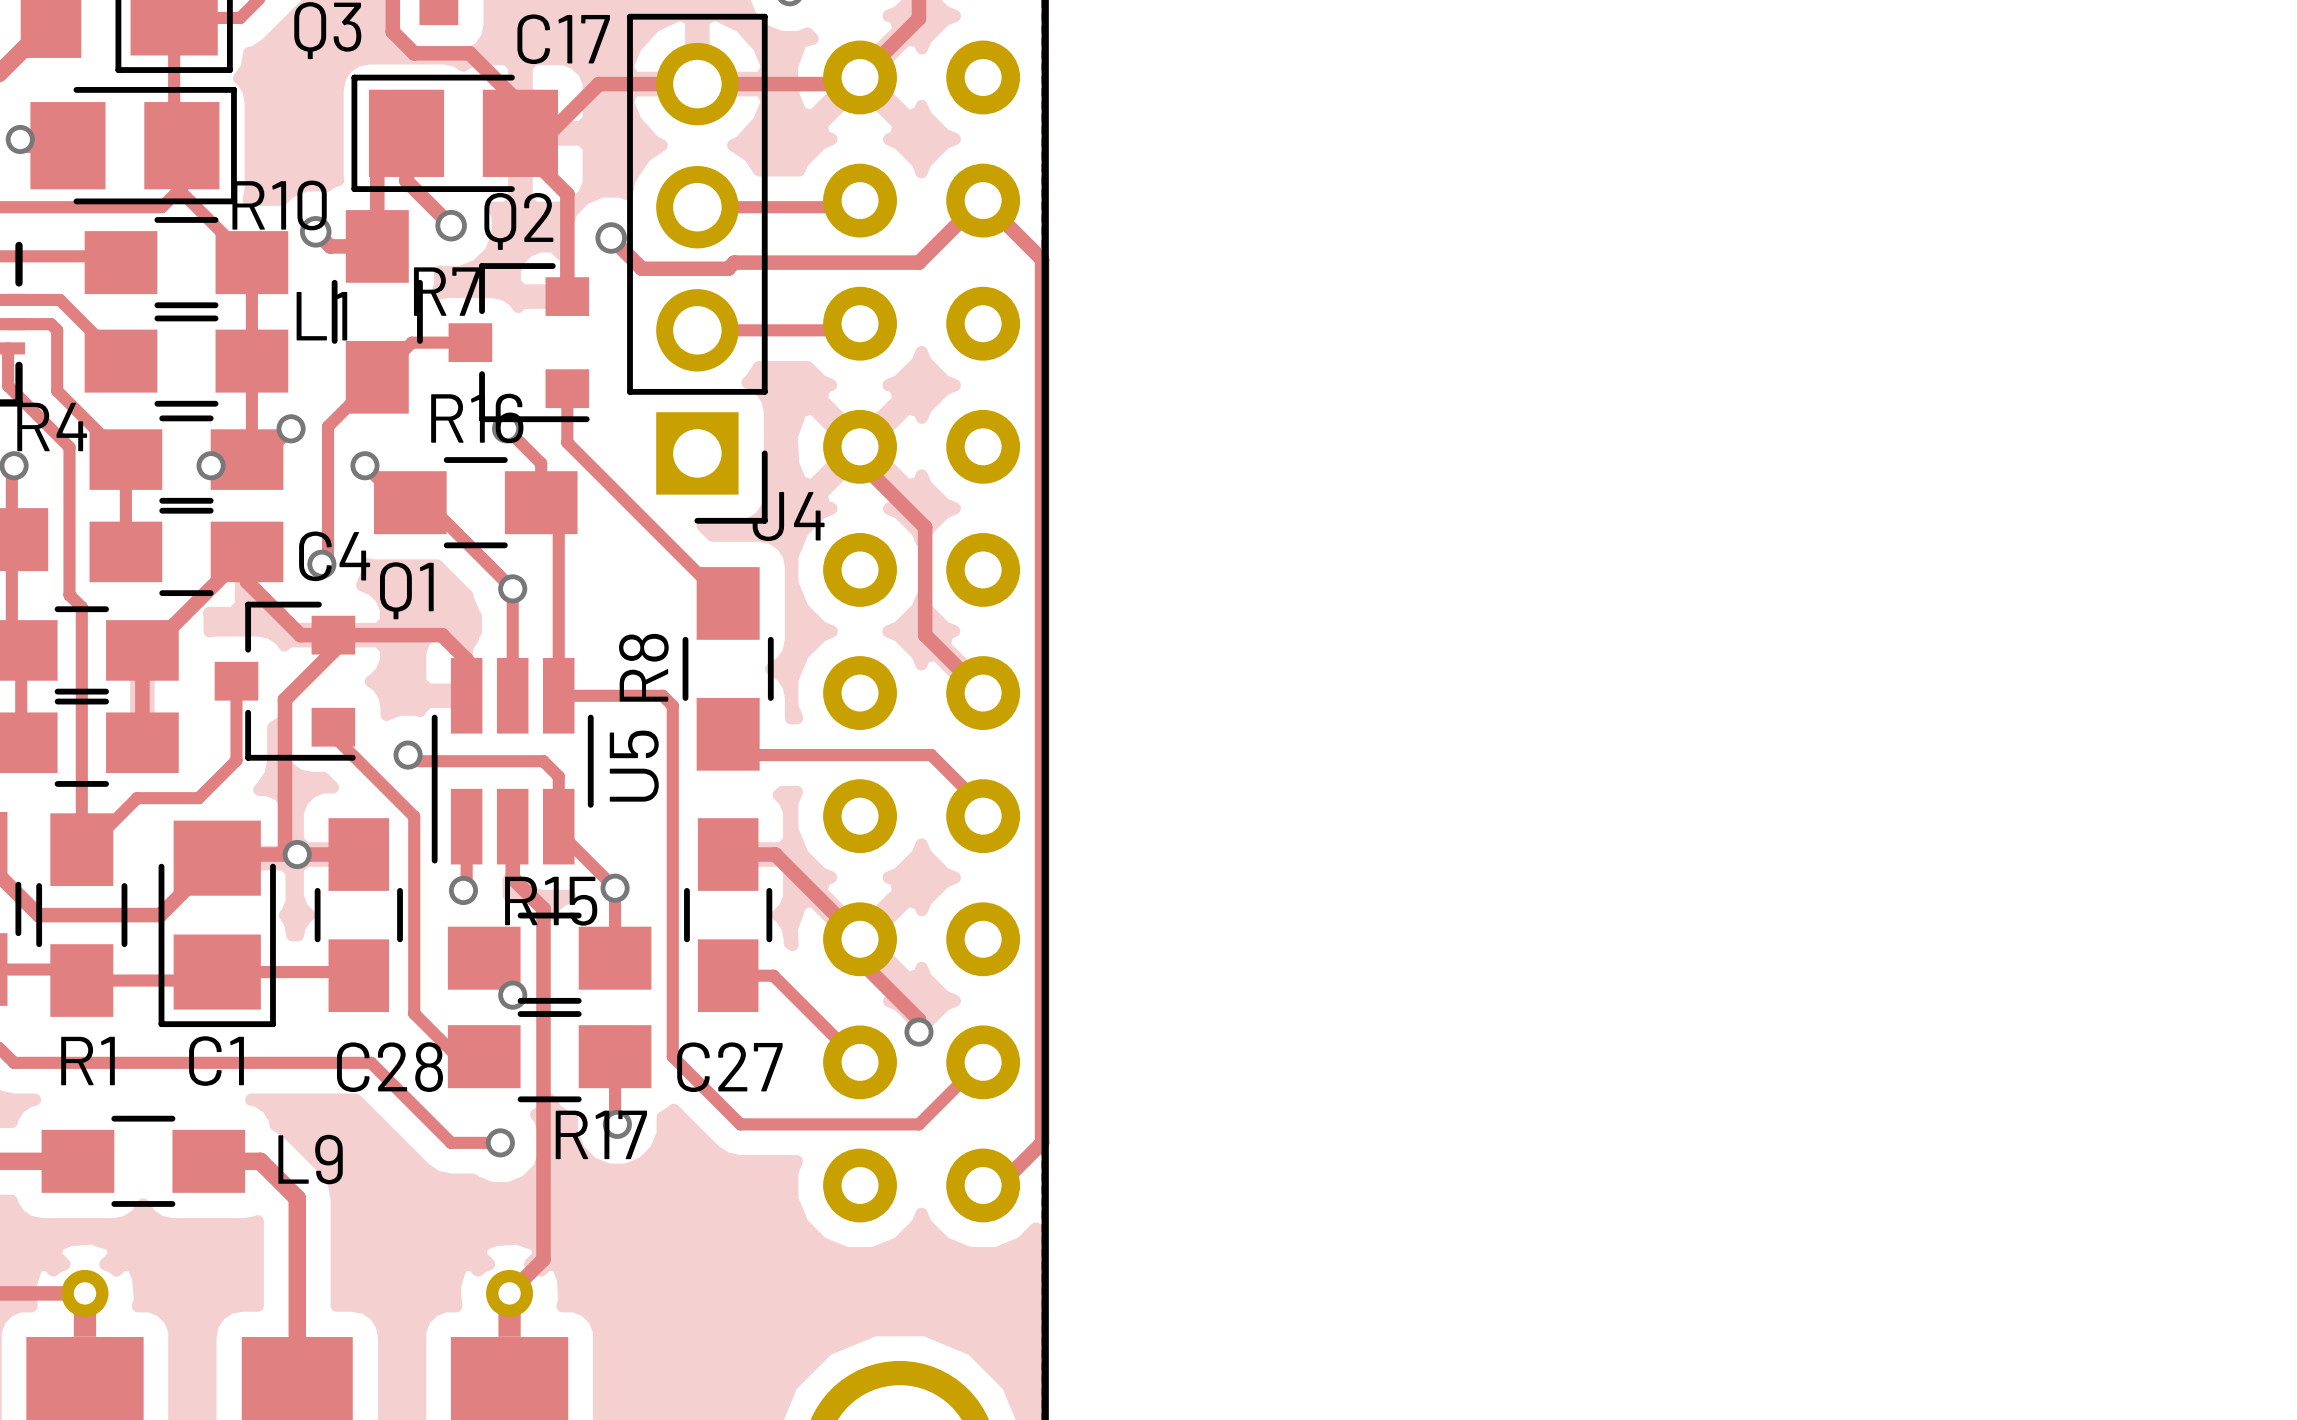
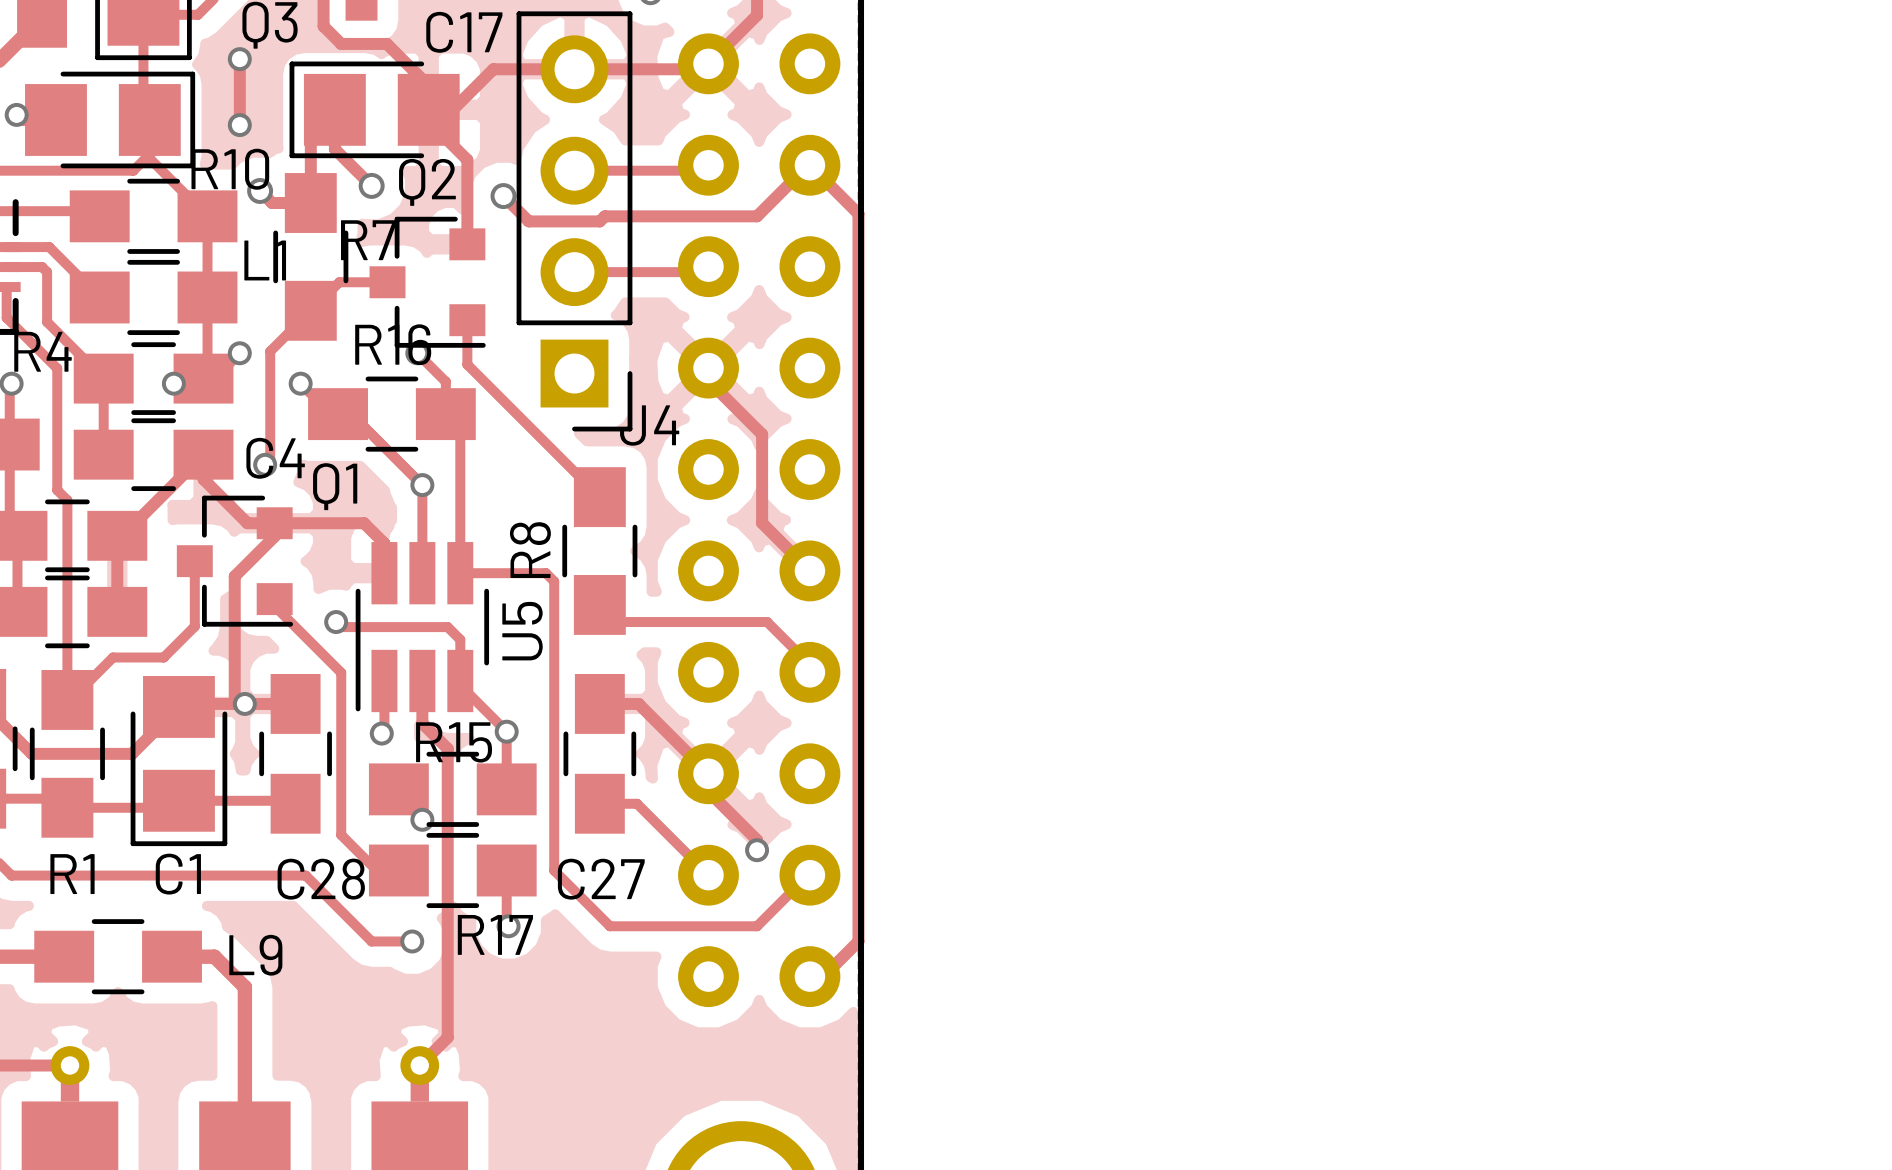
track: none -> (239, 59) (239, 125)
via: none -> (239, 59)
via: none -> (239, 125)

